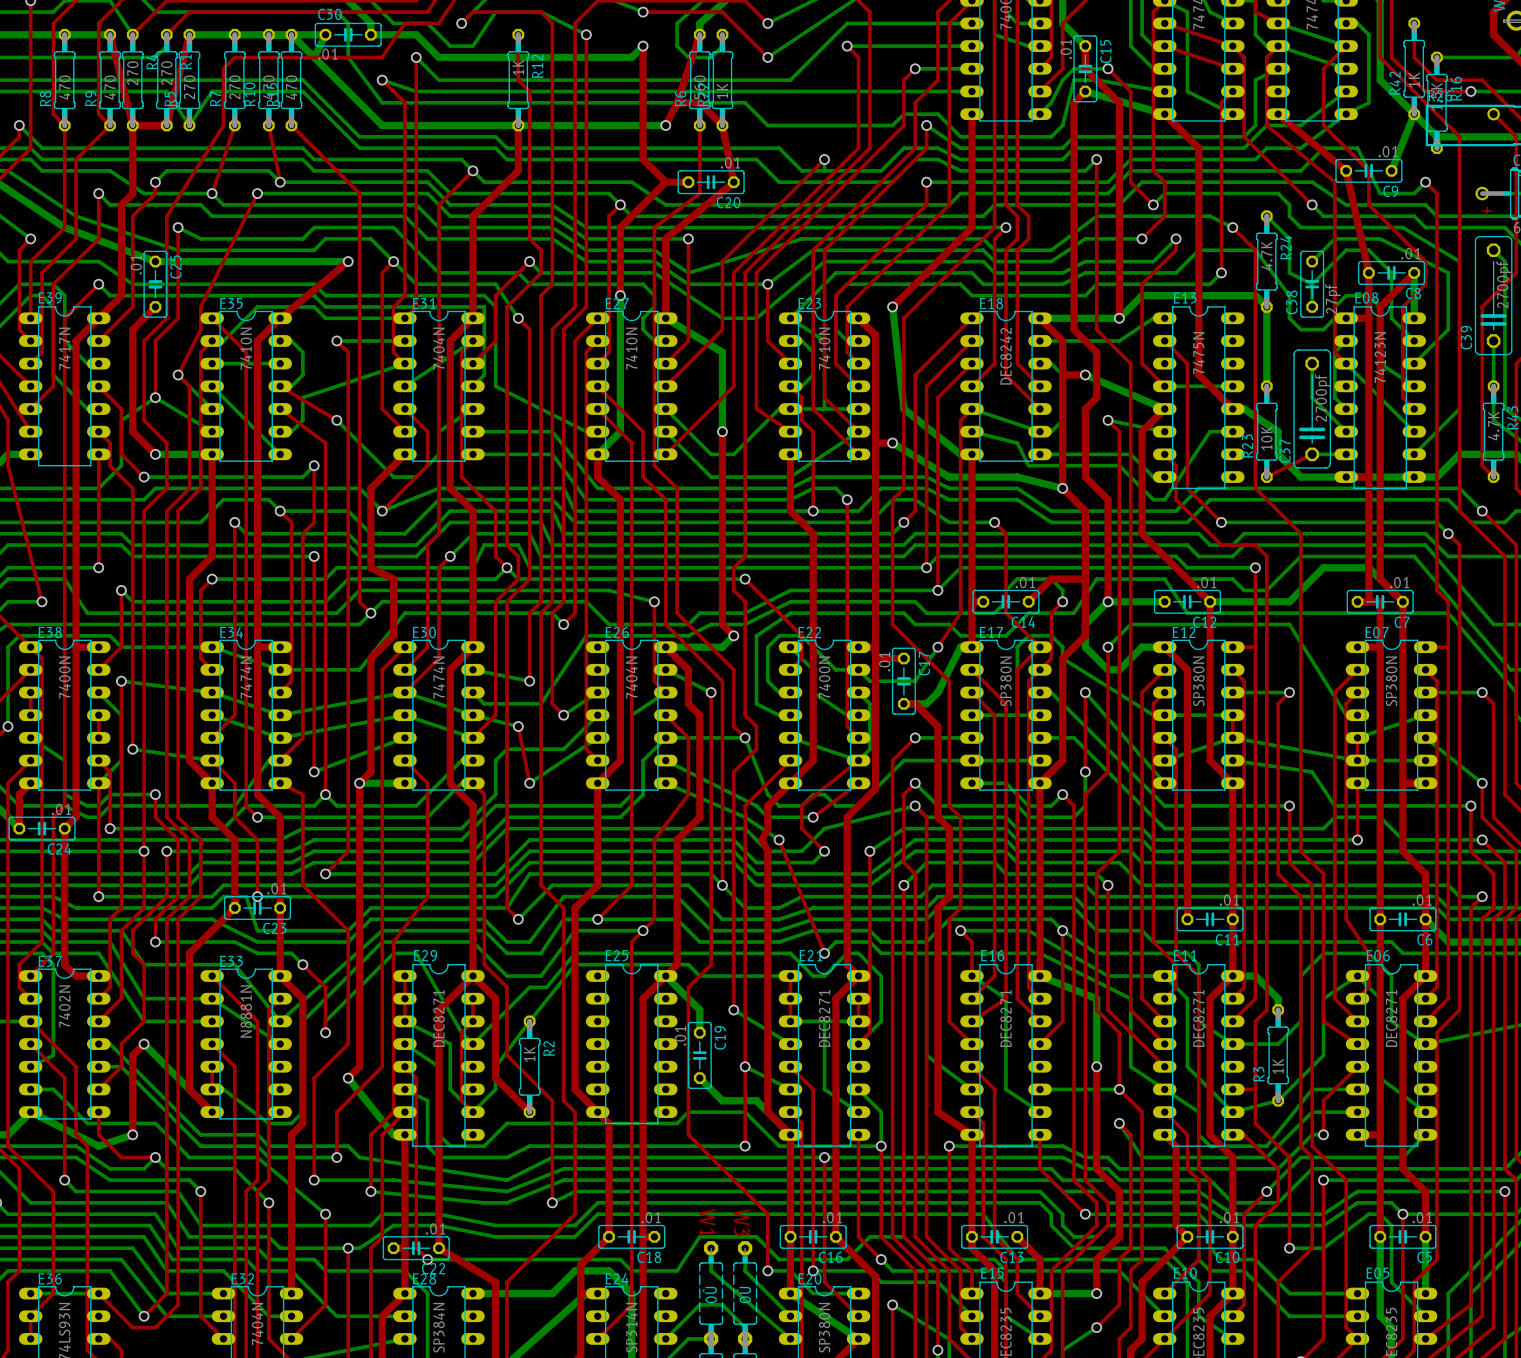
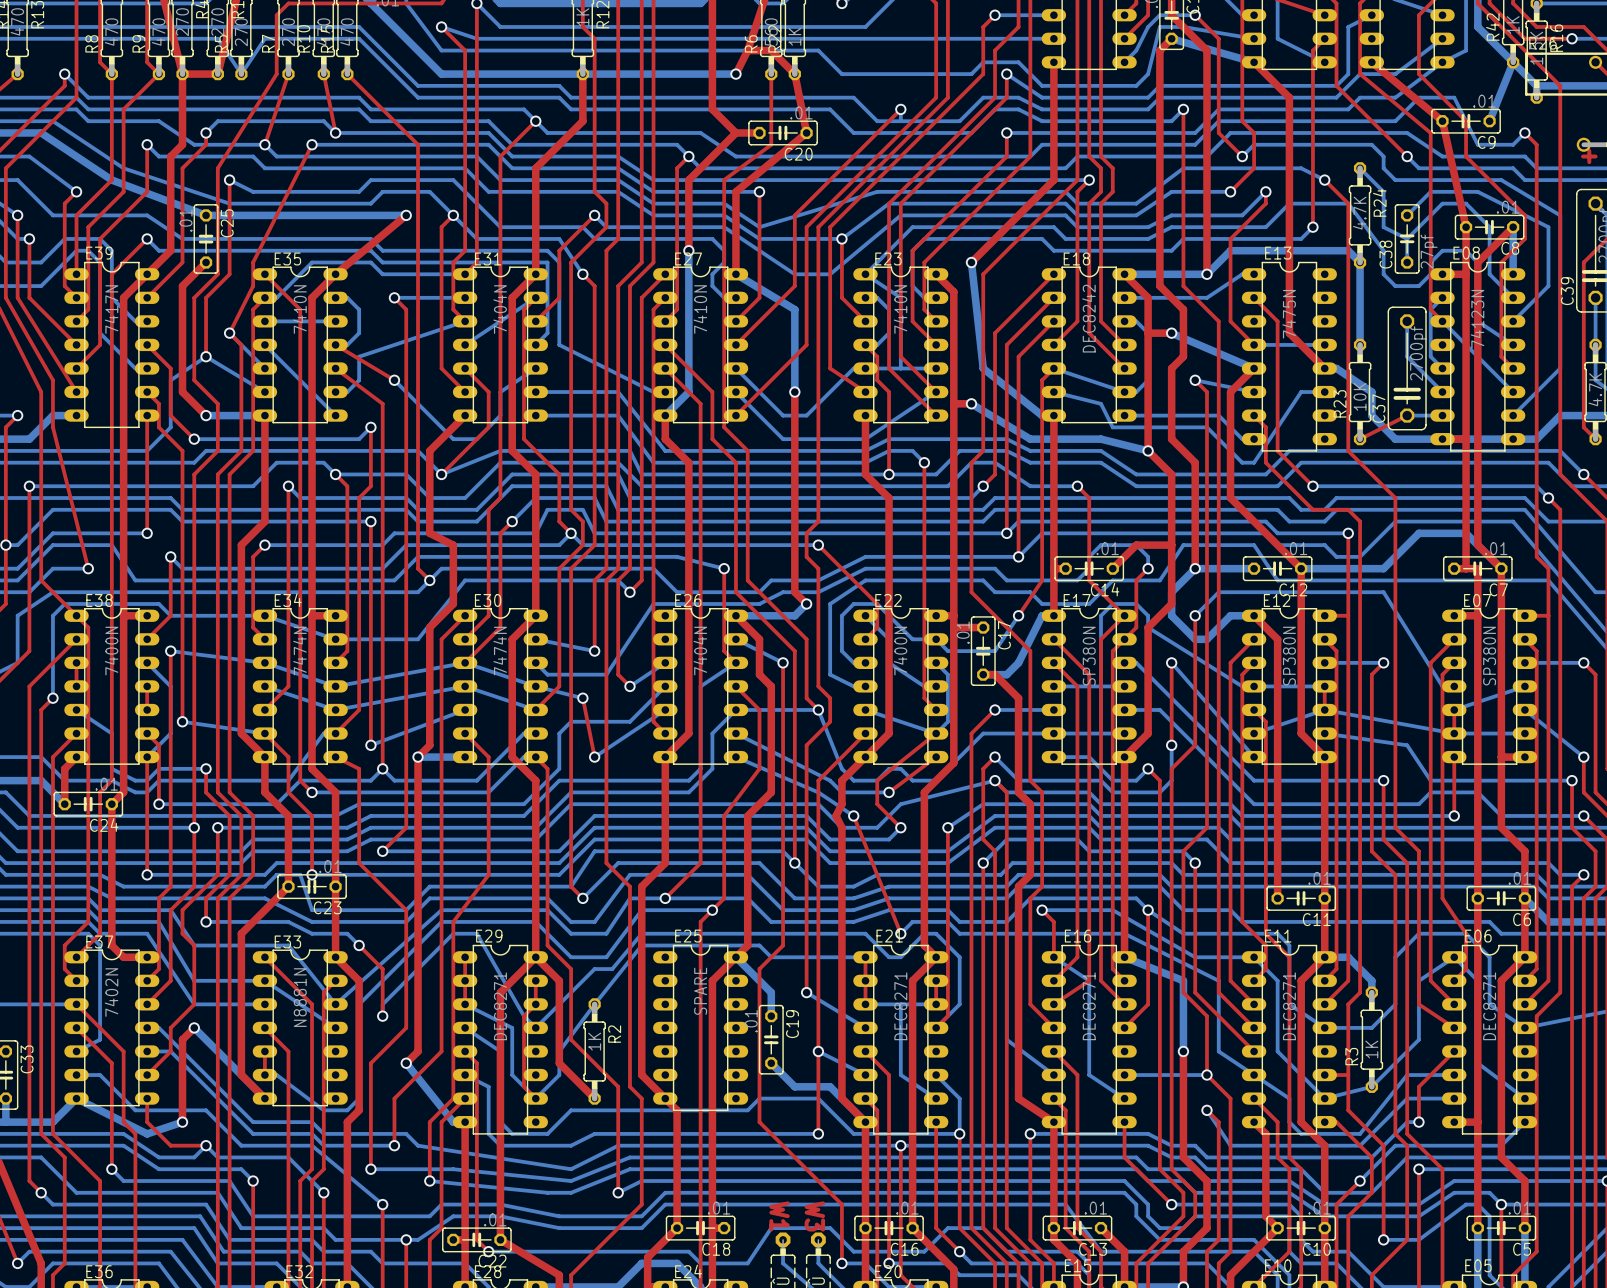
E25 value: none -> SPARE (700, 991)

